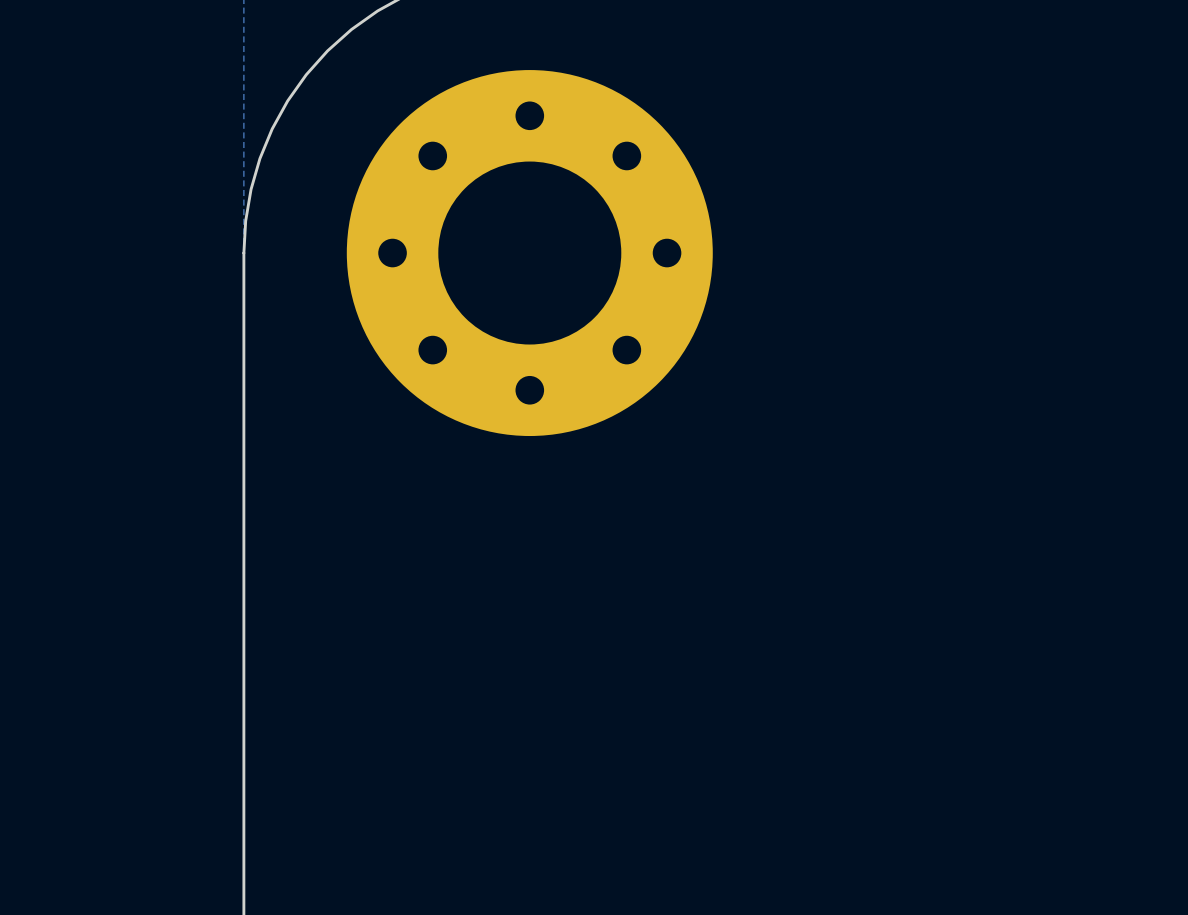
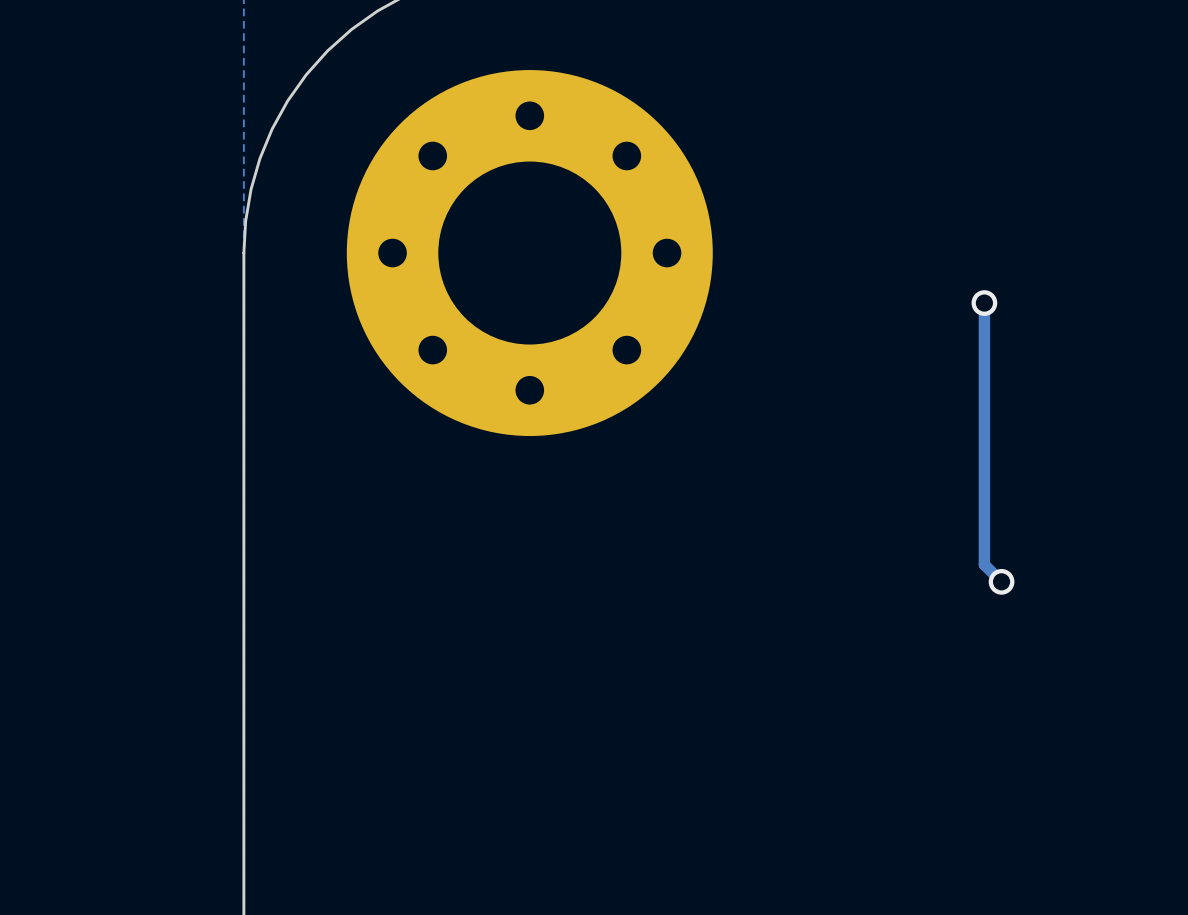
track: none -> (984, 303) (984, 564) (1001, 581)
via: none -> (984, 303)
via: none -> (1001, 581)

